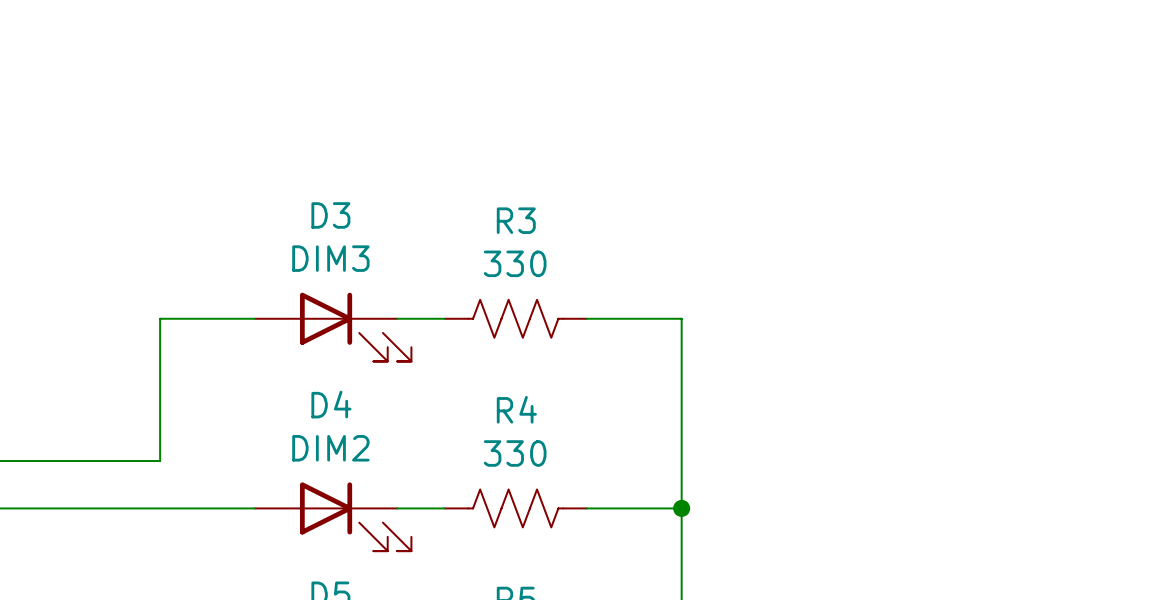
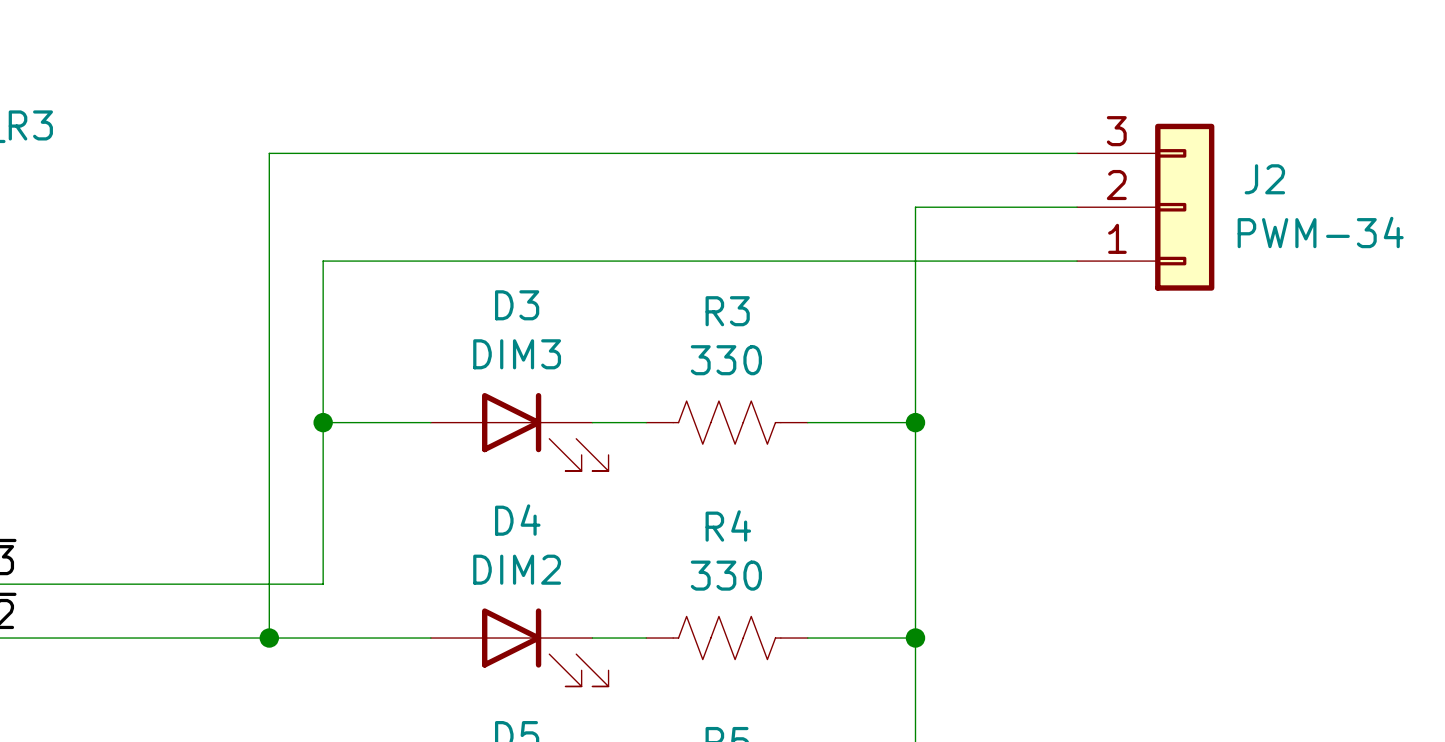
wire: none -> (1077, 153) (269, 153) (269, 638)
wire: none -> (1077, 207) (915, 207) (915, 422)
J2: none -> PWM-34 (1145, 207)
wire: none -> (1077, 261) (323, 261) (323, 422)
junction: none -> (323, 422)
junction: none -> (915, 422)
junction: none -> (269, 638)

